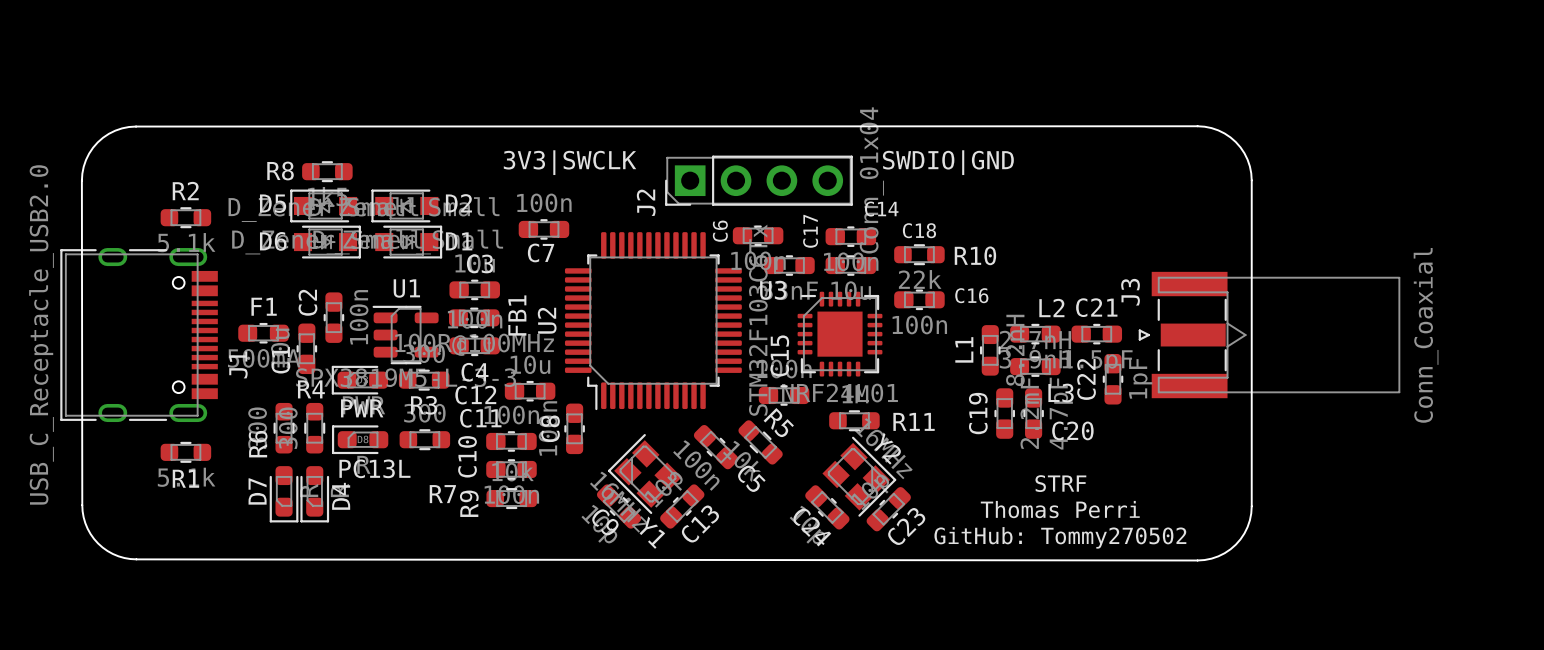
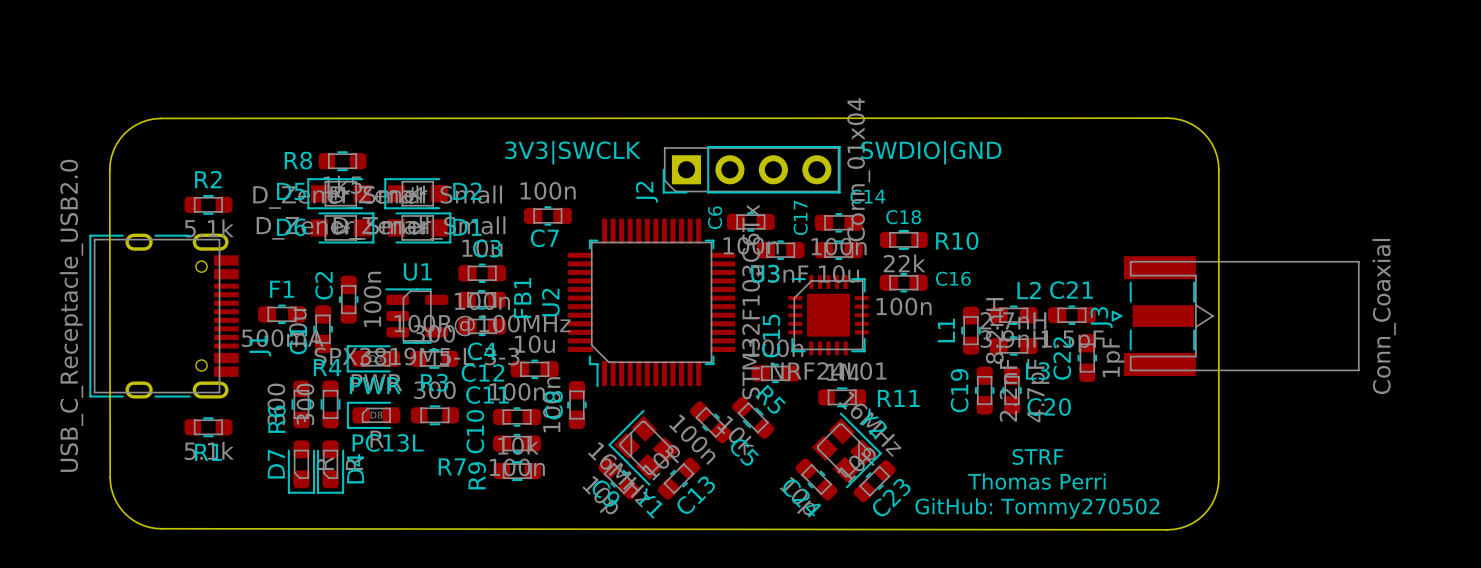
J3 name position: J3 (1130, 292) -> J3 (1101, 317)

